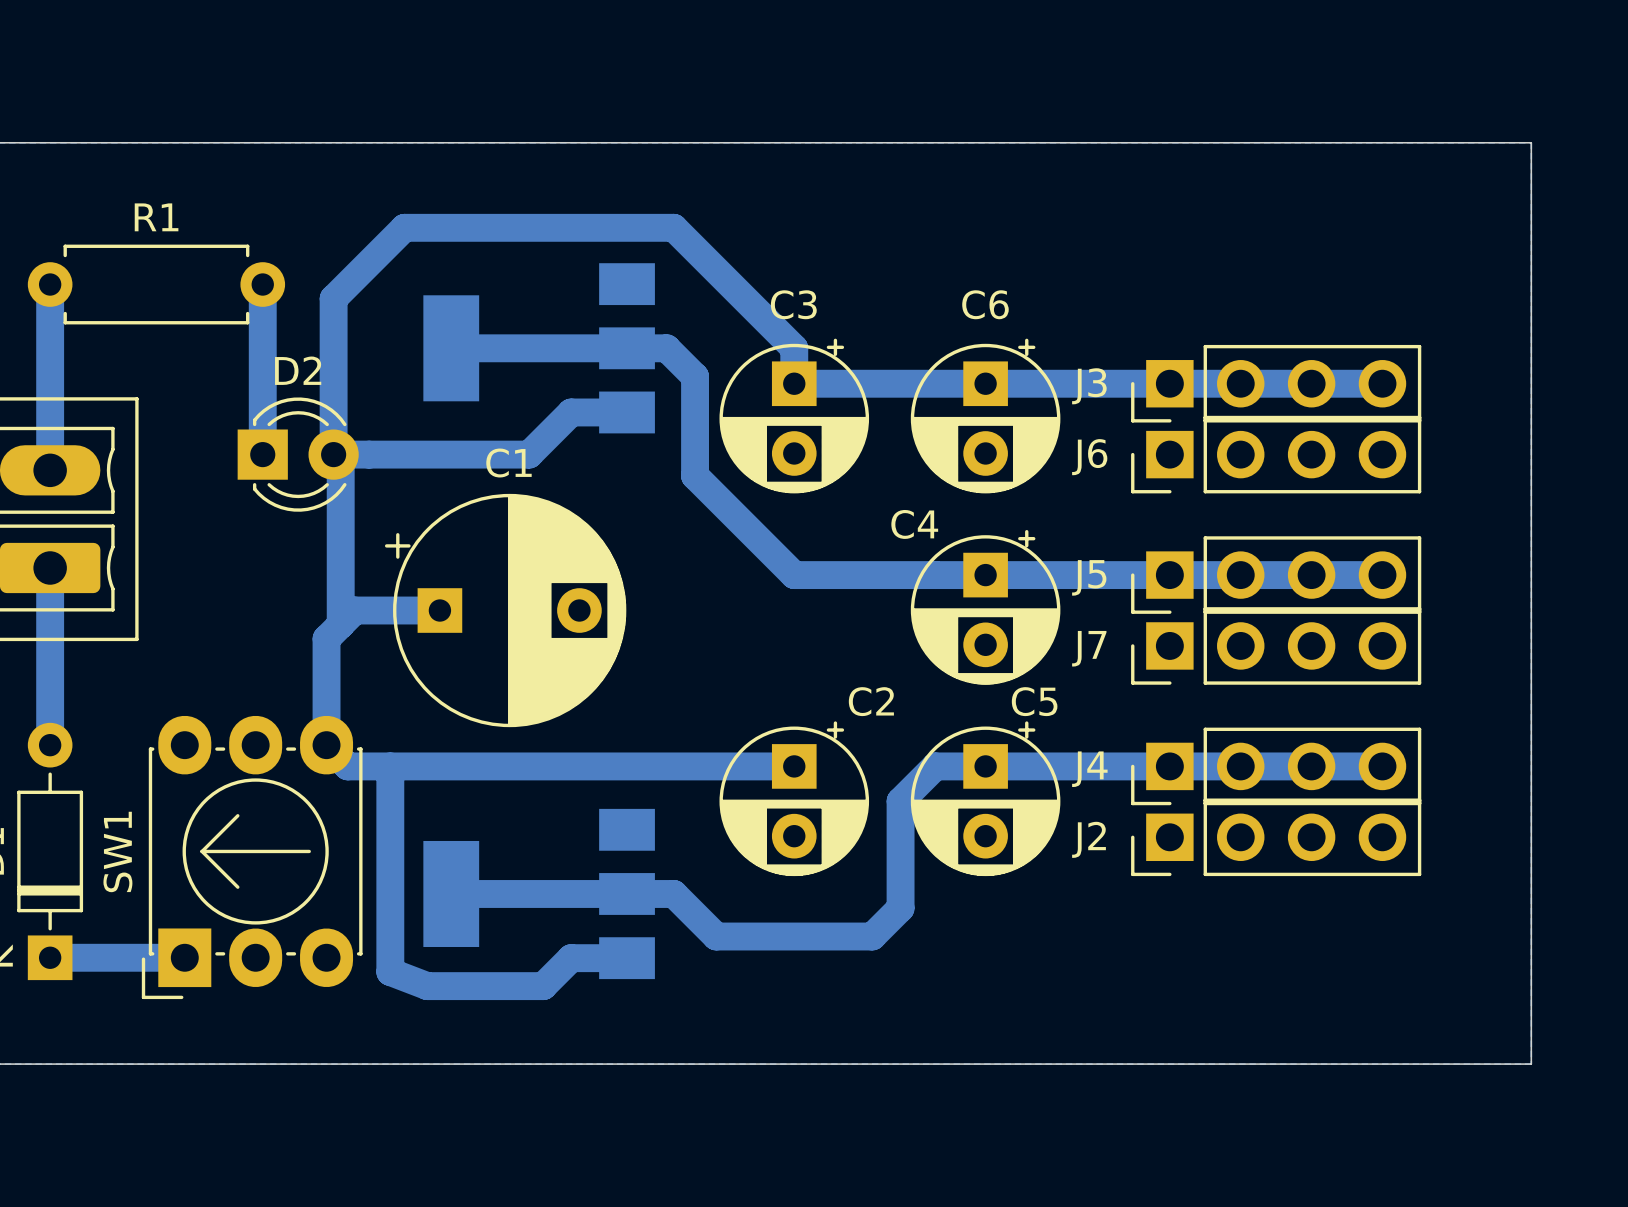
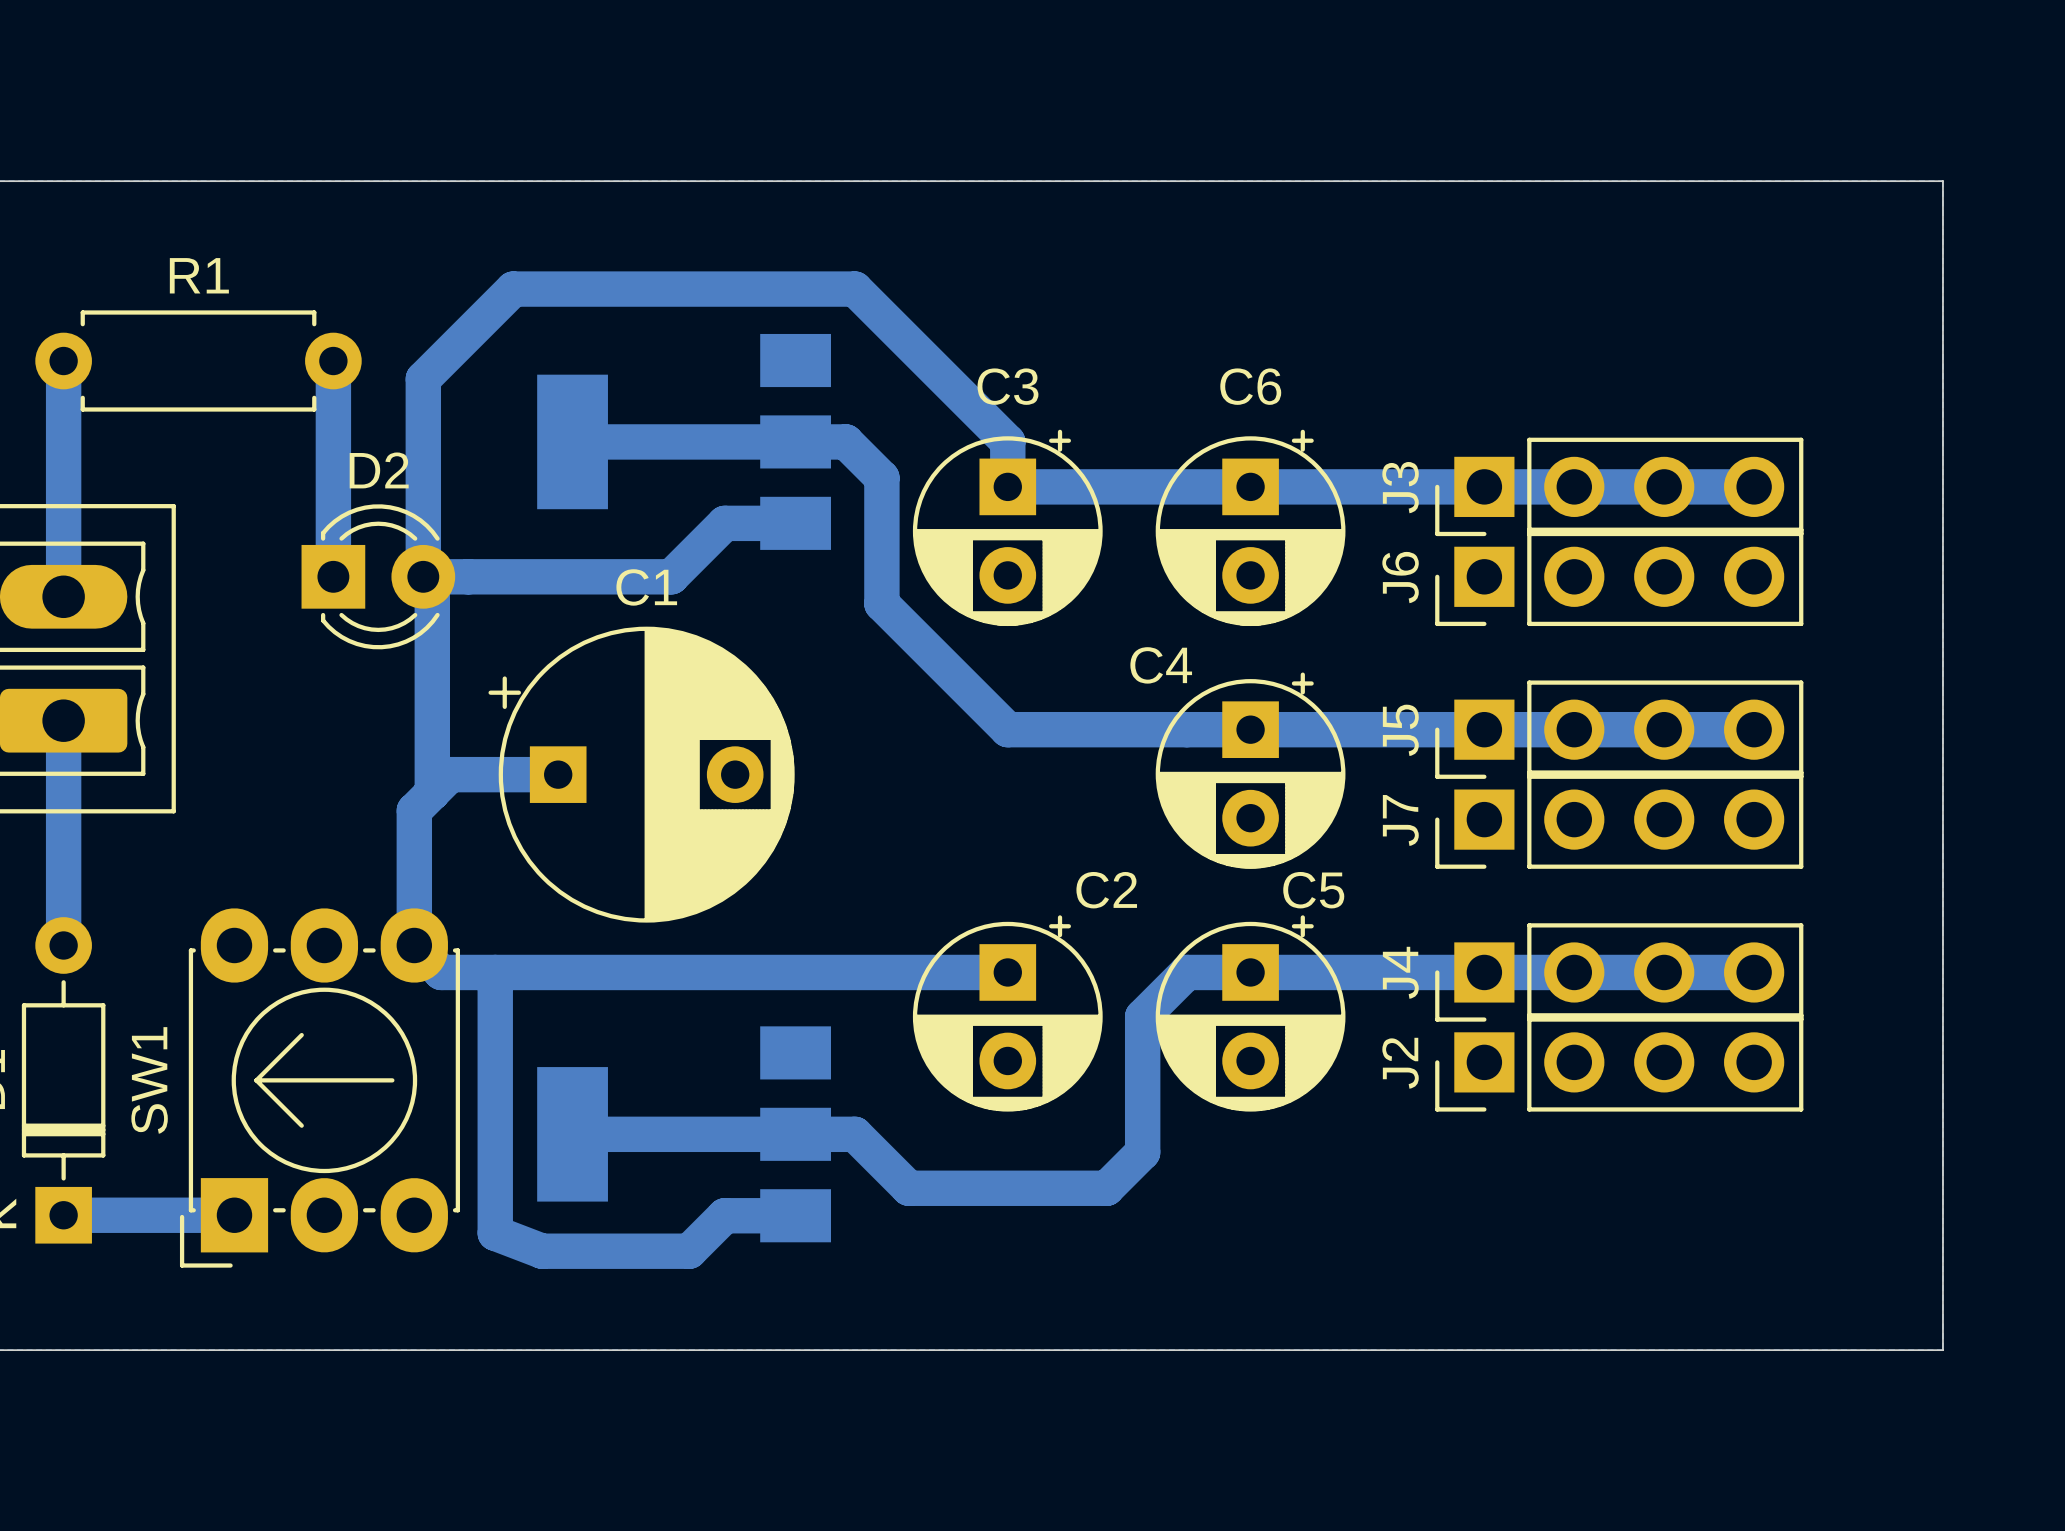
J3 name rotation: 0° (1089, 386) -> 90° counterclockwise (1400, 487)
J6 name rotation: 0° (1089, 457) -> 90° counterclockwise (1400, 577)
J5 name rotation: 0° (1089, 577) -> 90° counterclockwise (1400, 730)
J7 name rotation: 0° (1089, 648) -> 90° counterclockwise (1400, 820)
J4 name rotation: 0° (1089, 769) -> 90° counterclockwise (1400, 972)
J2 name rotation: 0° (1089, 839) -> 90° counterclockwise (1400, 1063)

